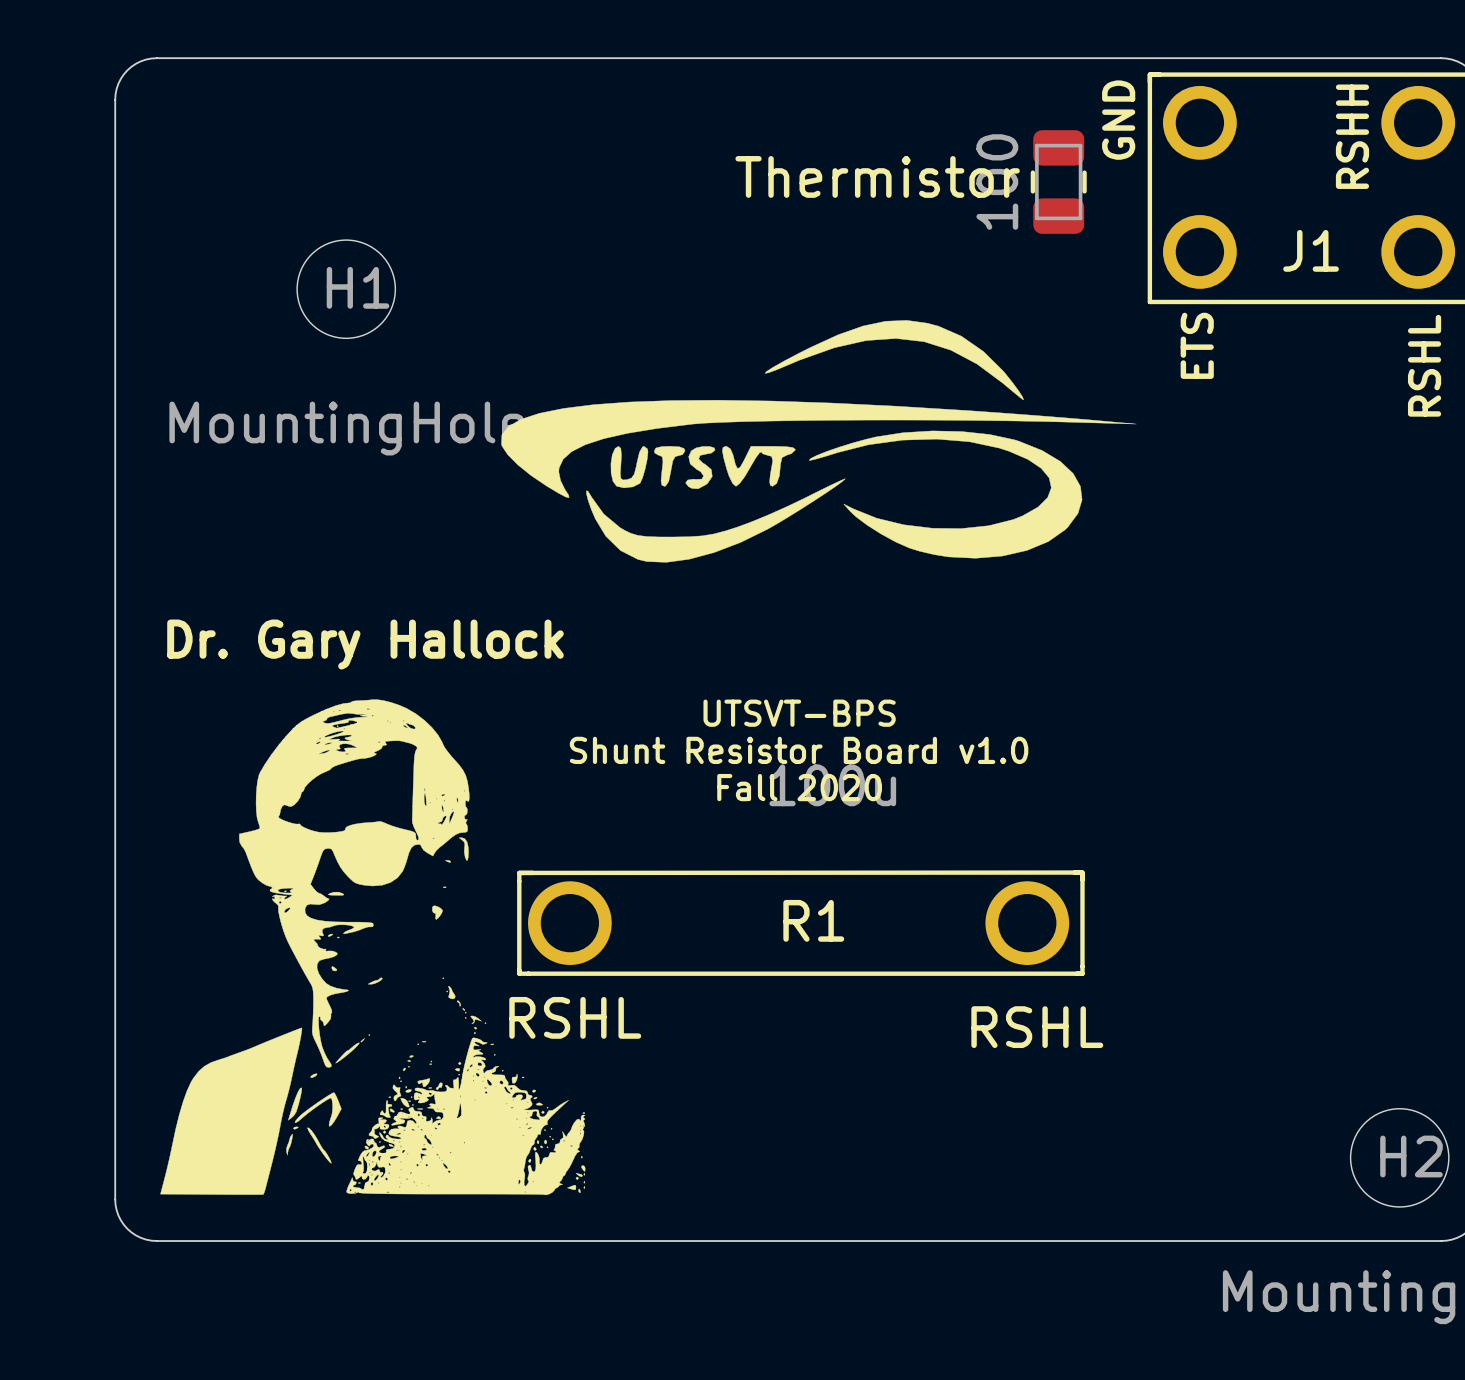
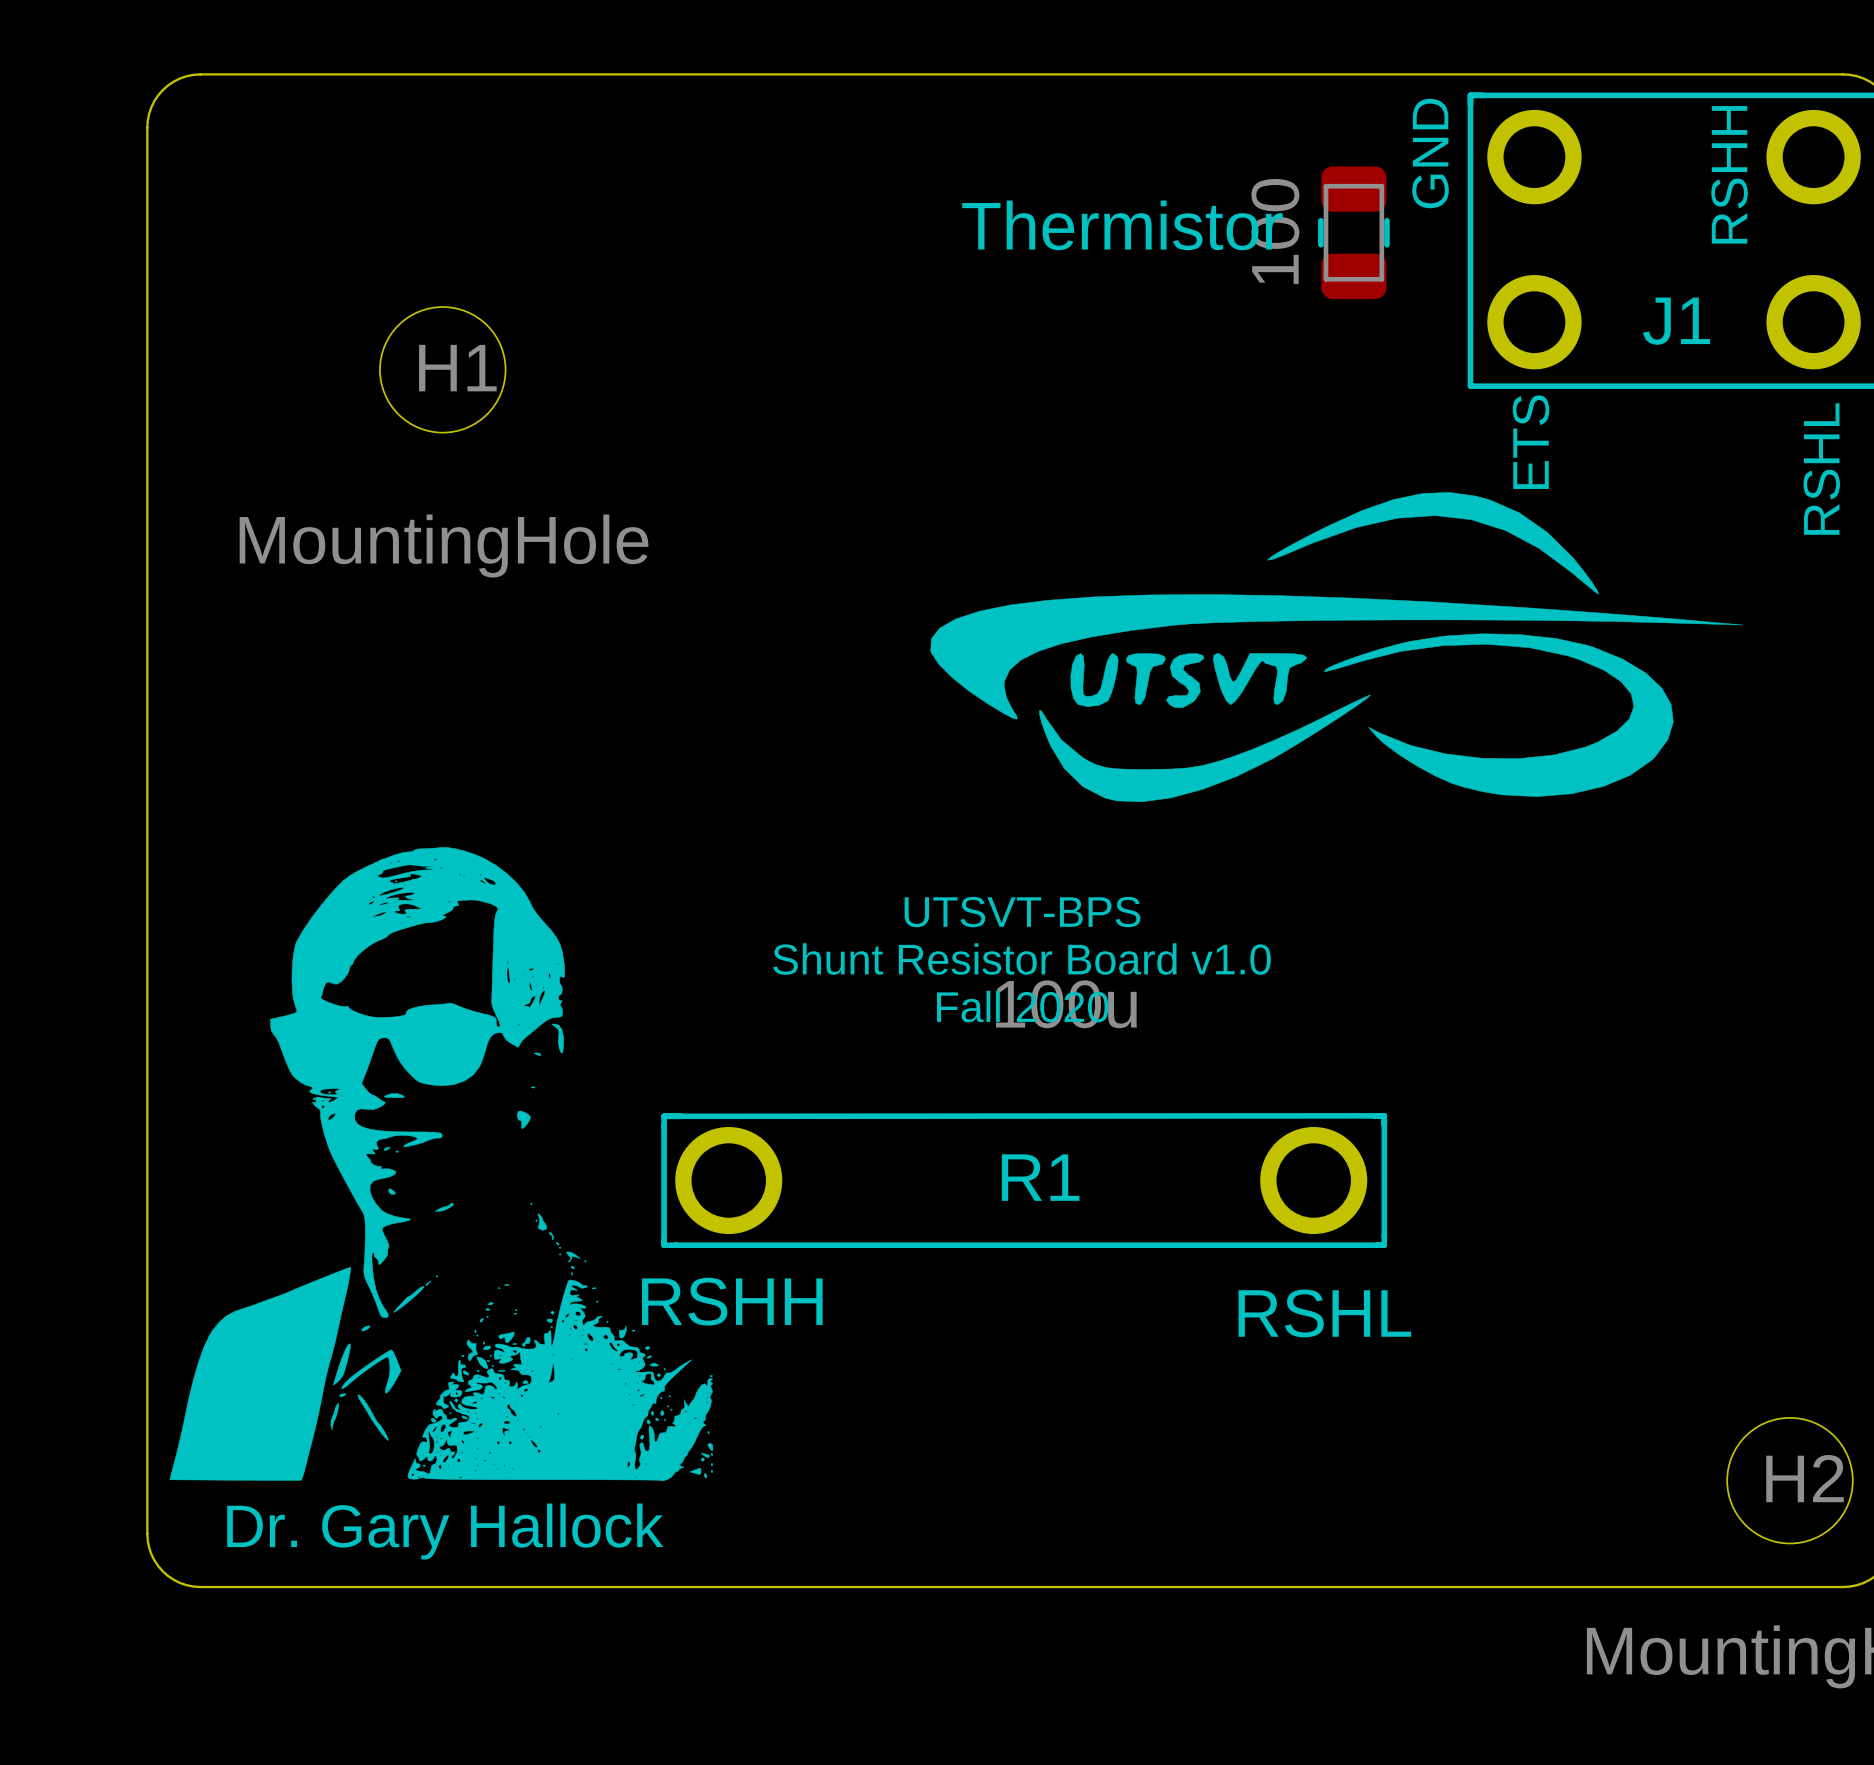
drawing position: (818, 441) -> (1336, 647)
text position: Dr. Gary Hallock (365, 644) -> Dr. Gary Hallock (445, 1531)
drawing position: (372, 947) -> (441, 1164)
text: RSHL (575, 1017) -> RSHH (732, 1301)

